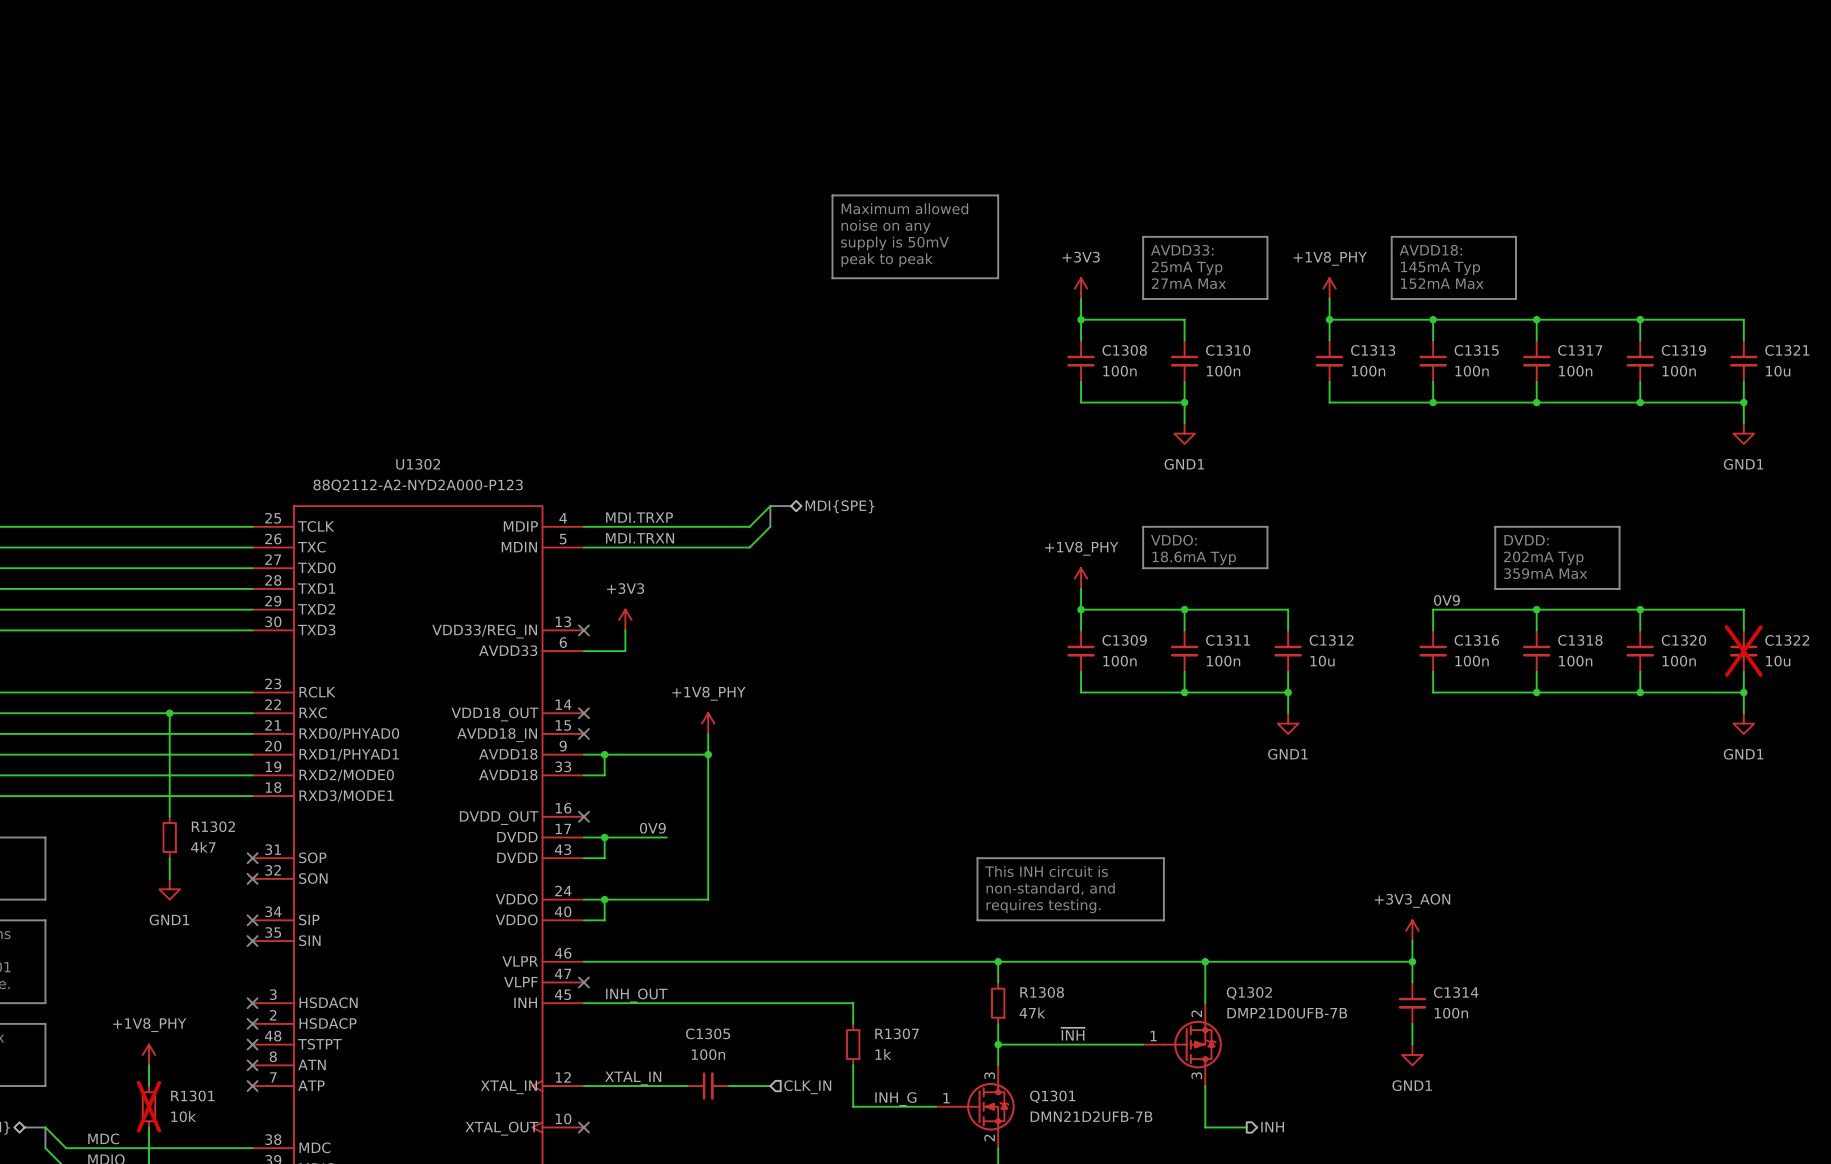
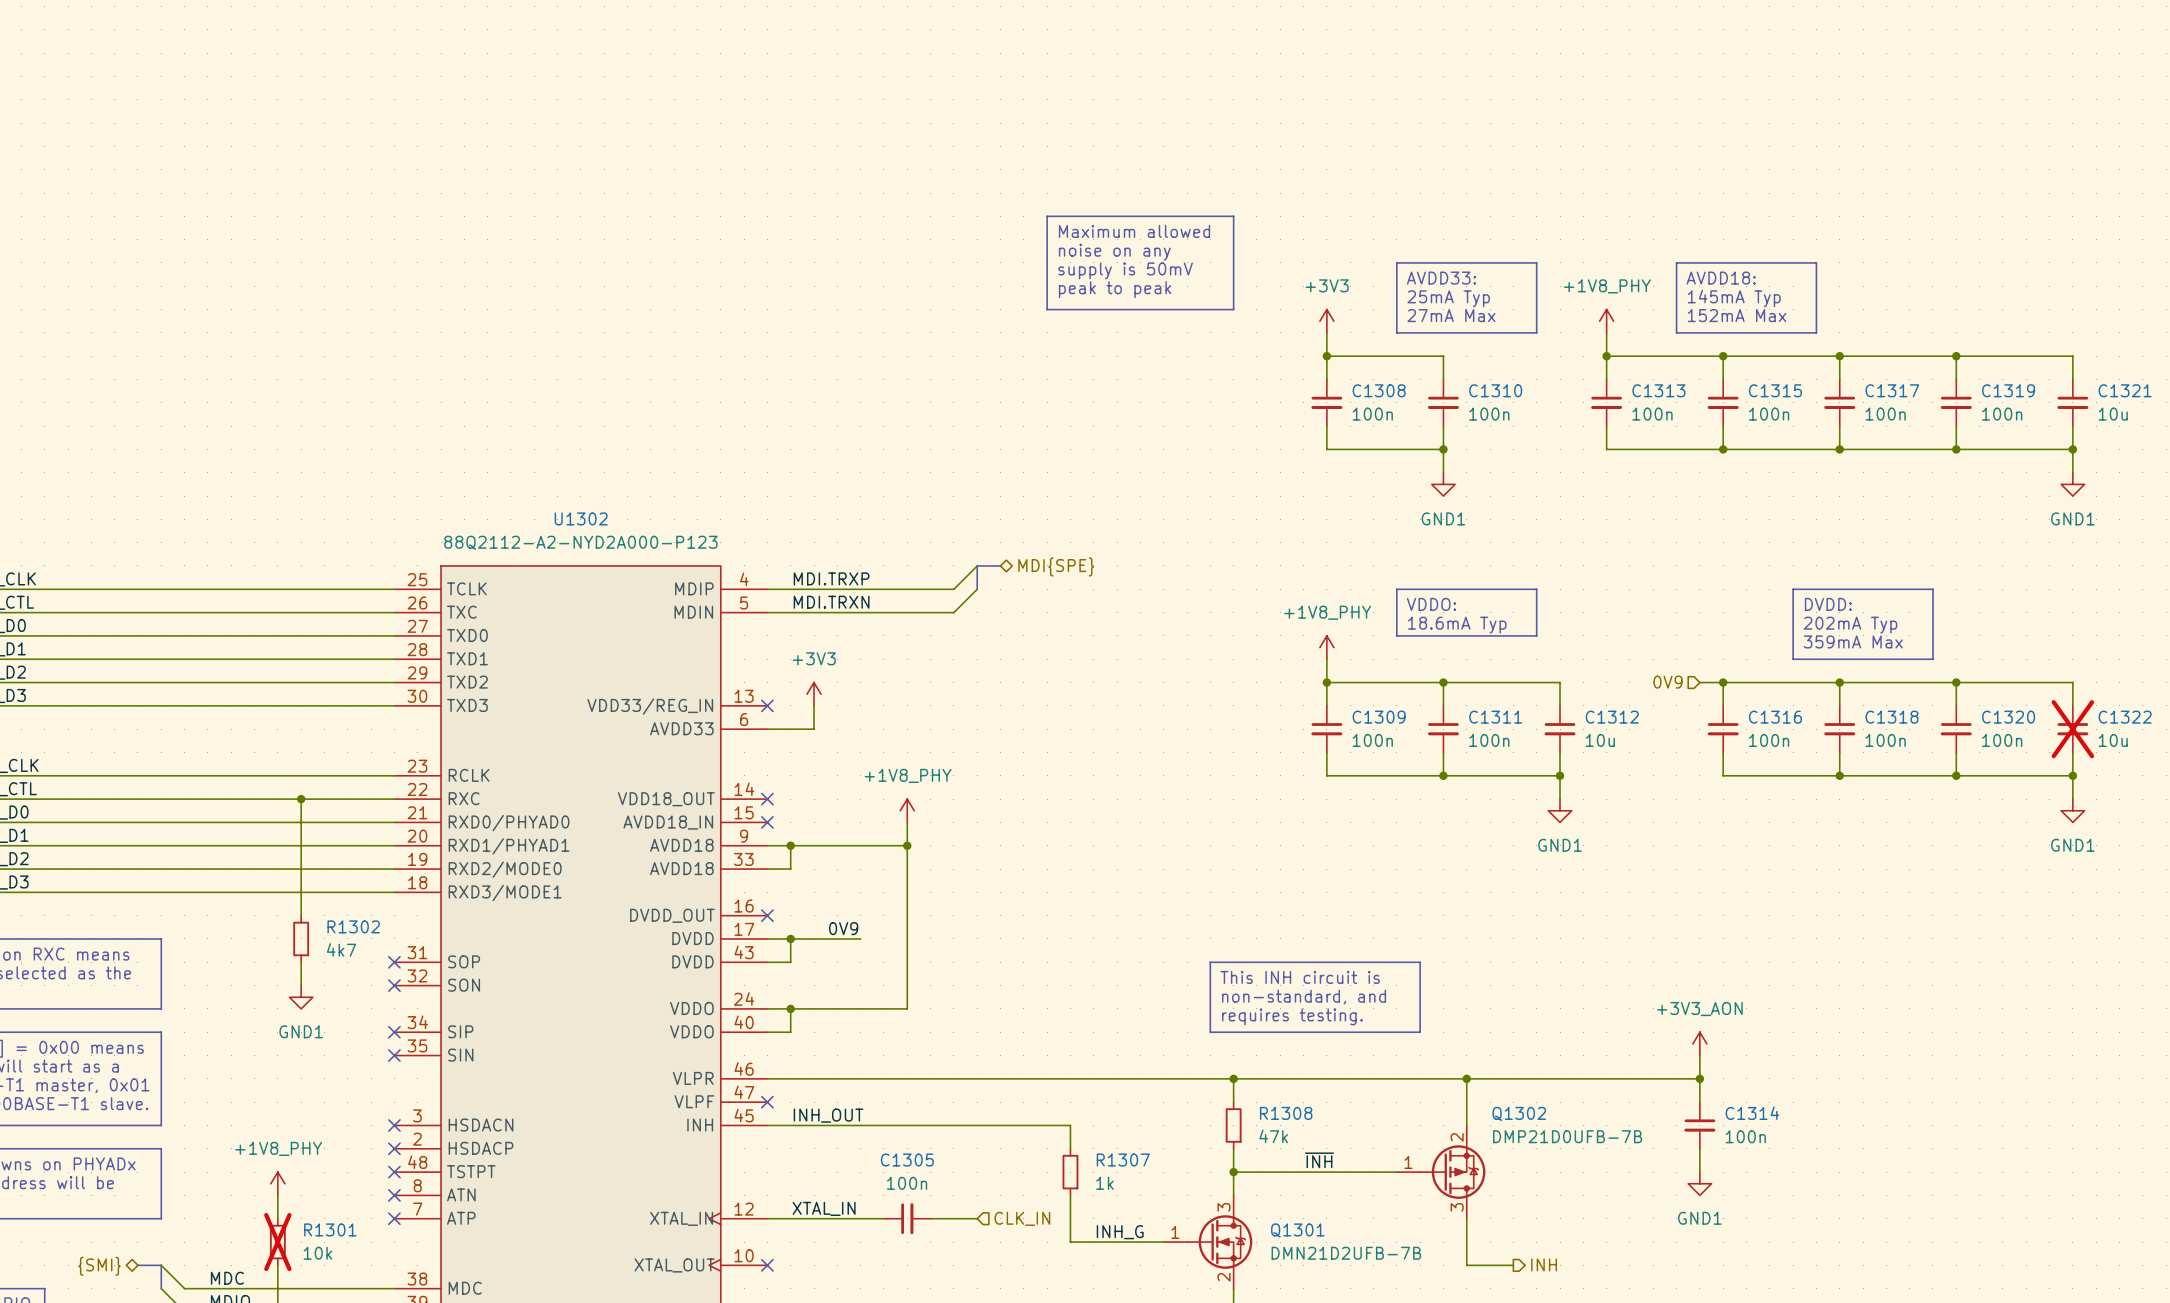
label: 0V9 (1447, 600) -> none
hierarchical label: none -> 0V9 (1668, 682)
wire: none -> (1699, 682) (1723, 682)
junction: none -> (1723, 682)

